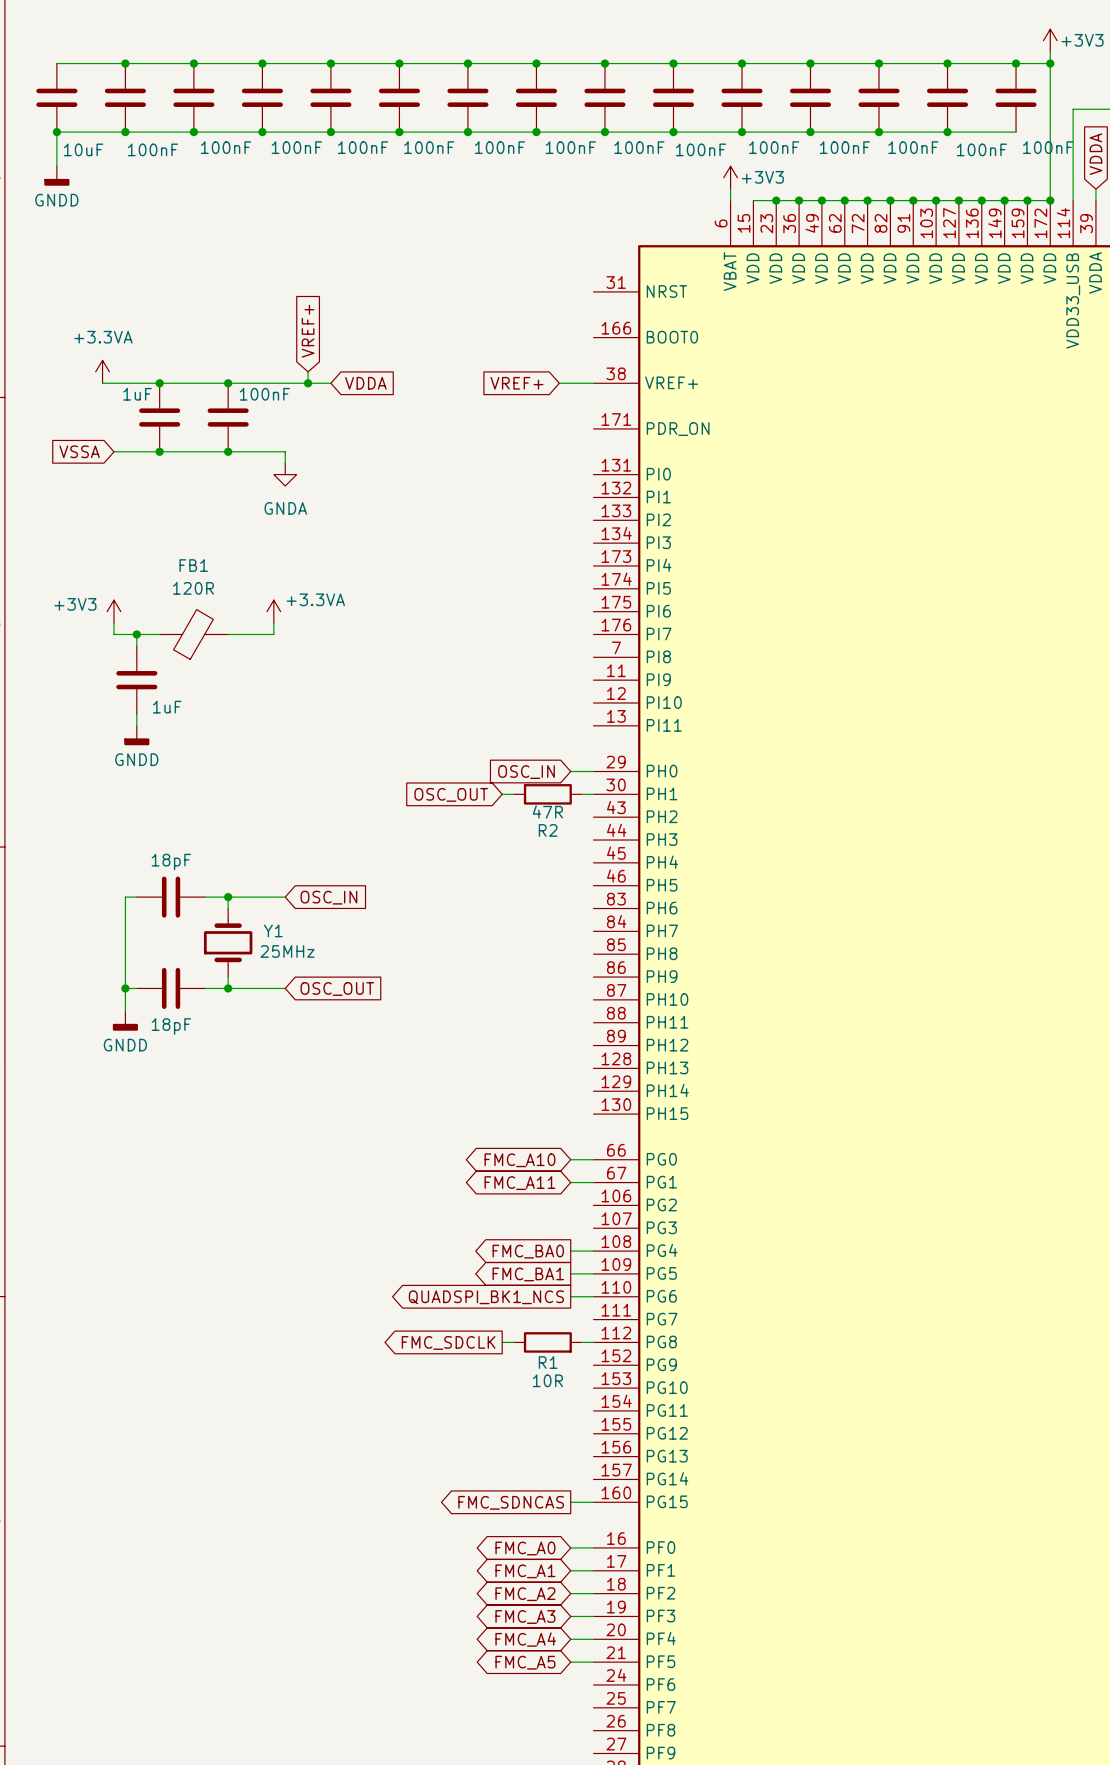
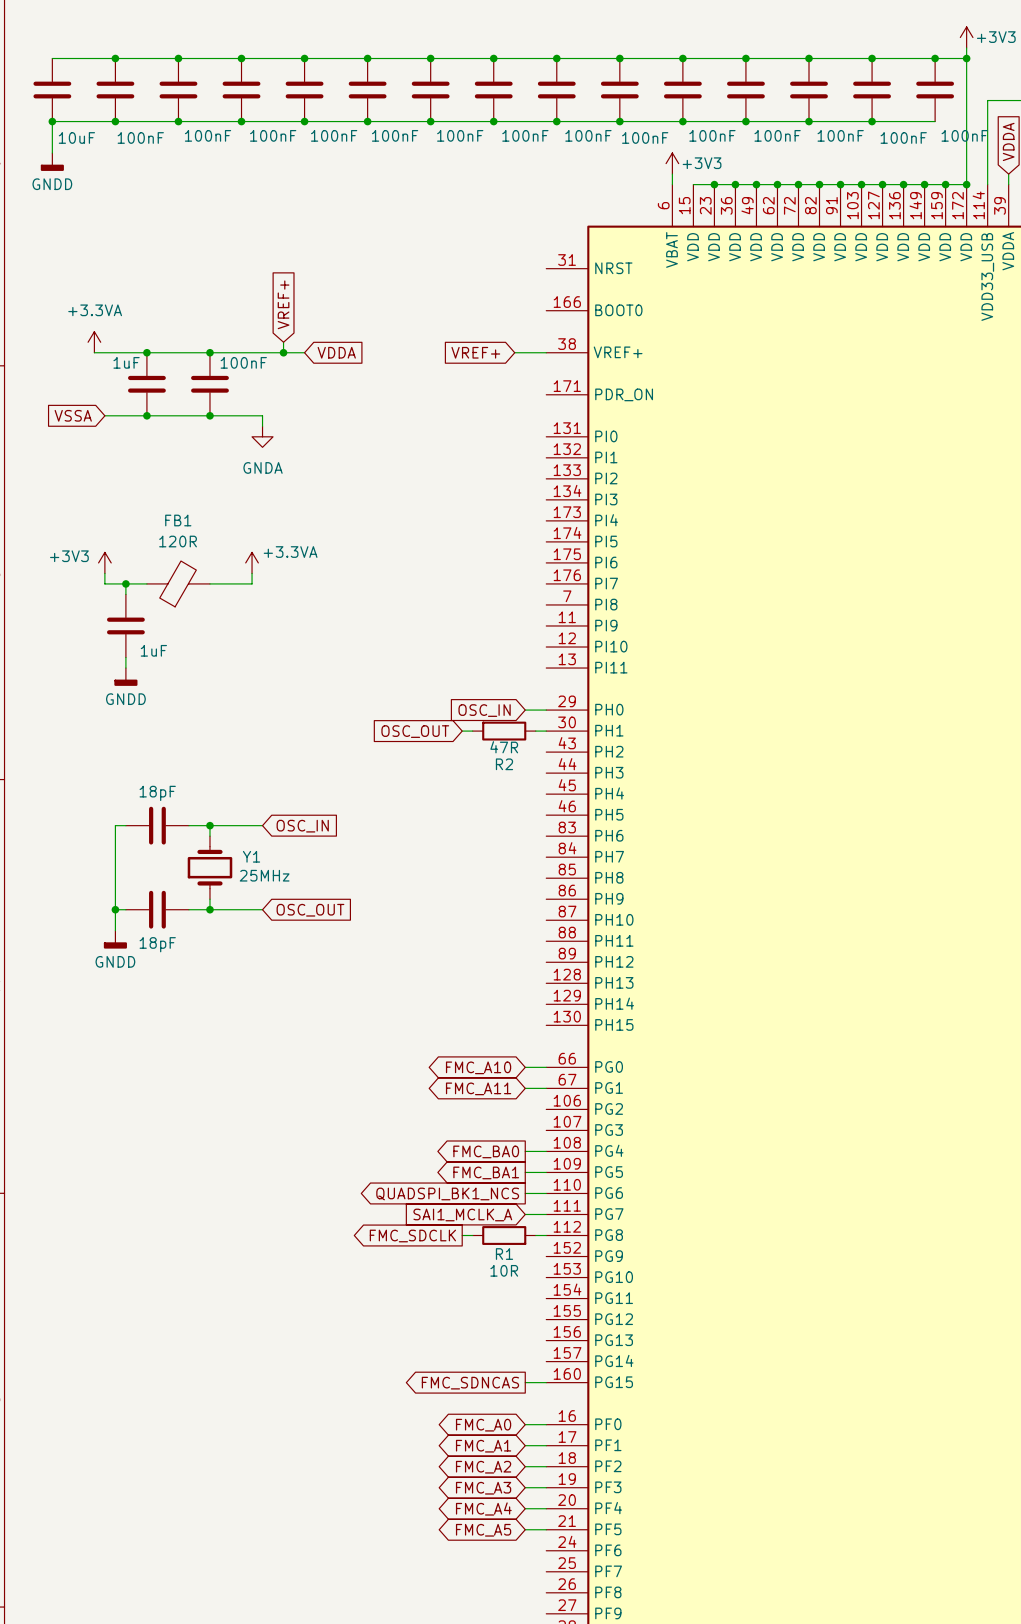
wire: none -> (525, 1214) (546, 1214)
global label: none -> SAI1_MCLK_A (462, 1214)

